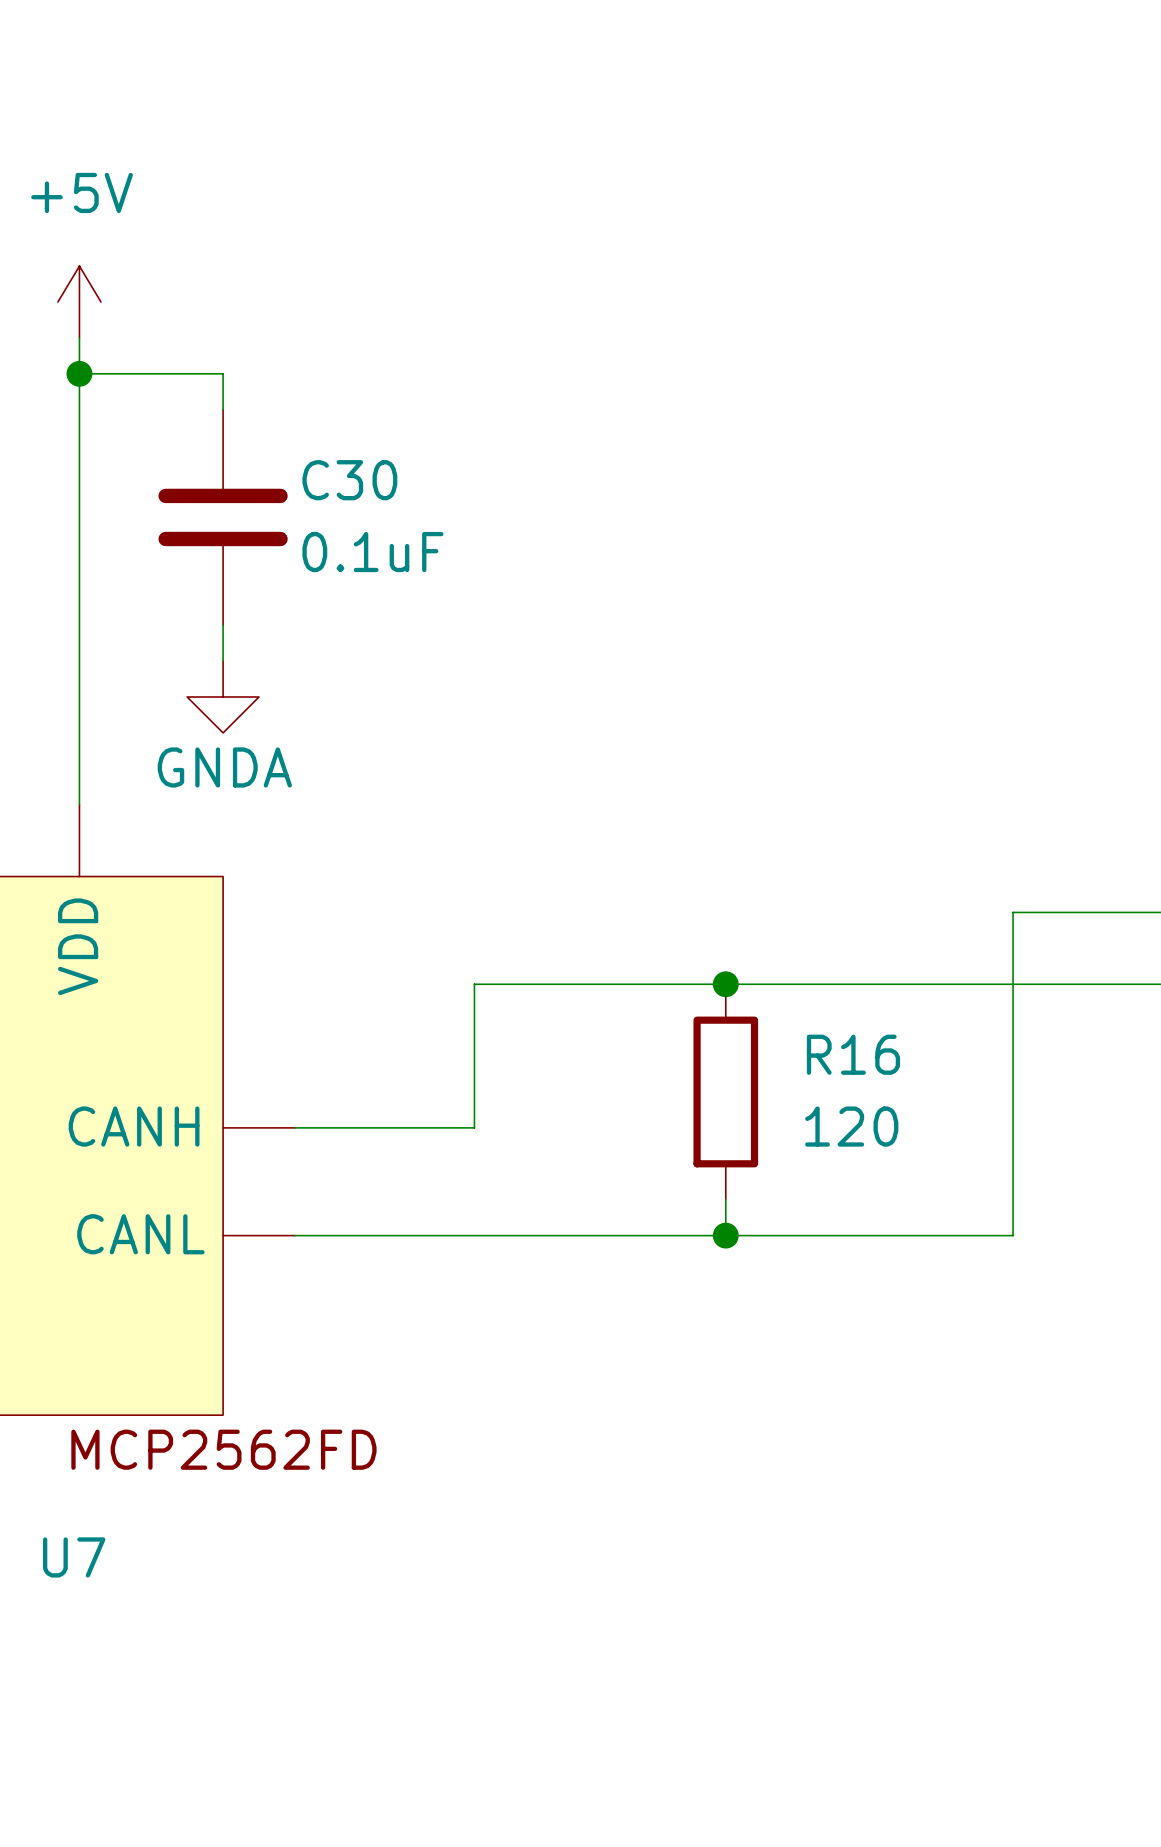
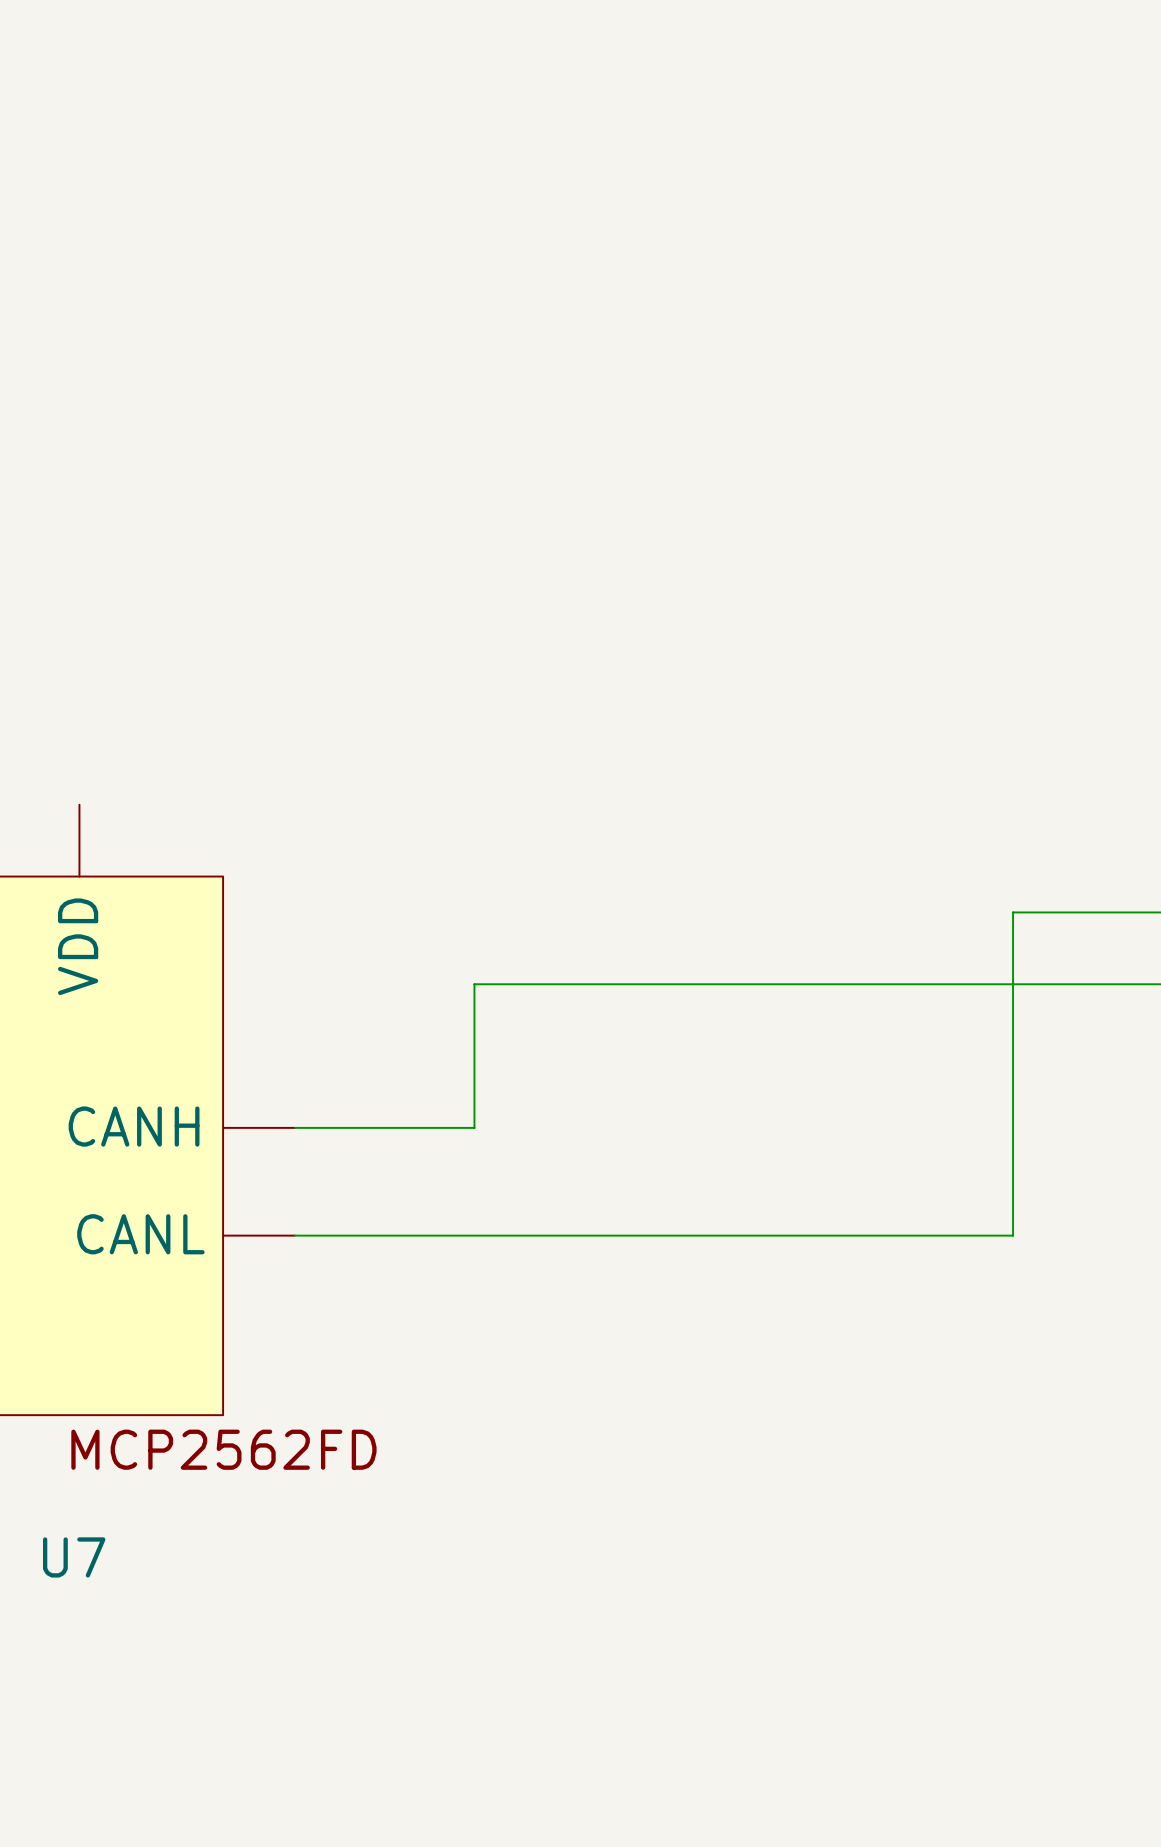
power symbol: +5V (79, 302) -> none
wire: (79, 337) (79, 804) -> none
wire: (79, 373) (223, 373) (223, 409) -> none
junction: (79, 373) -> none
C30: 0.1uF (223, 517) -> none
wire: (223, 625) (223, 661) -> none
power symbol: GNDA (223, 697) -> none
junction: (725, 984) -> none
R16: 120 (725, 1091) -> none
wire: (725, 1199) (725, 1235) -> none
junction: (725, 1235) -> none

